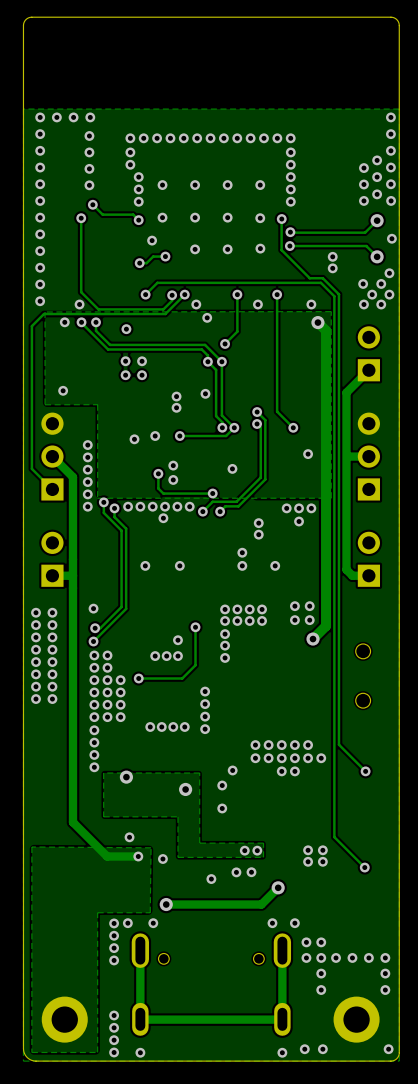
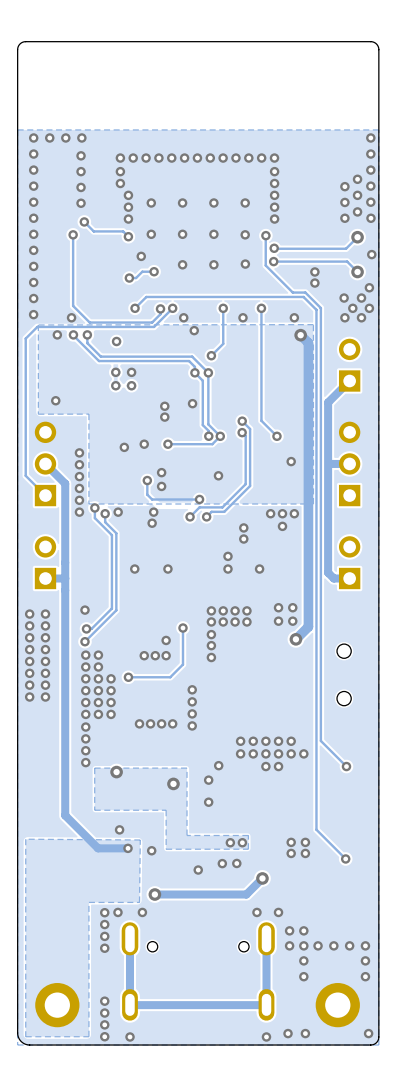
via: (140, 506) -> none
via: (152, 506) -> none
via: (177, 506) -> none
via: (189, 506) -> none

